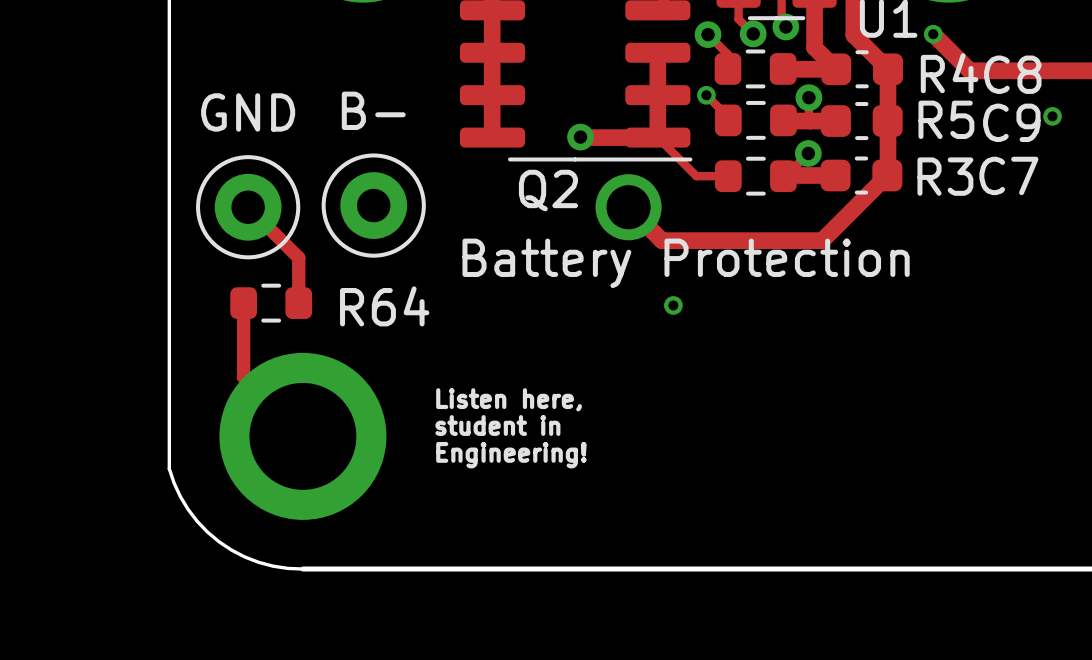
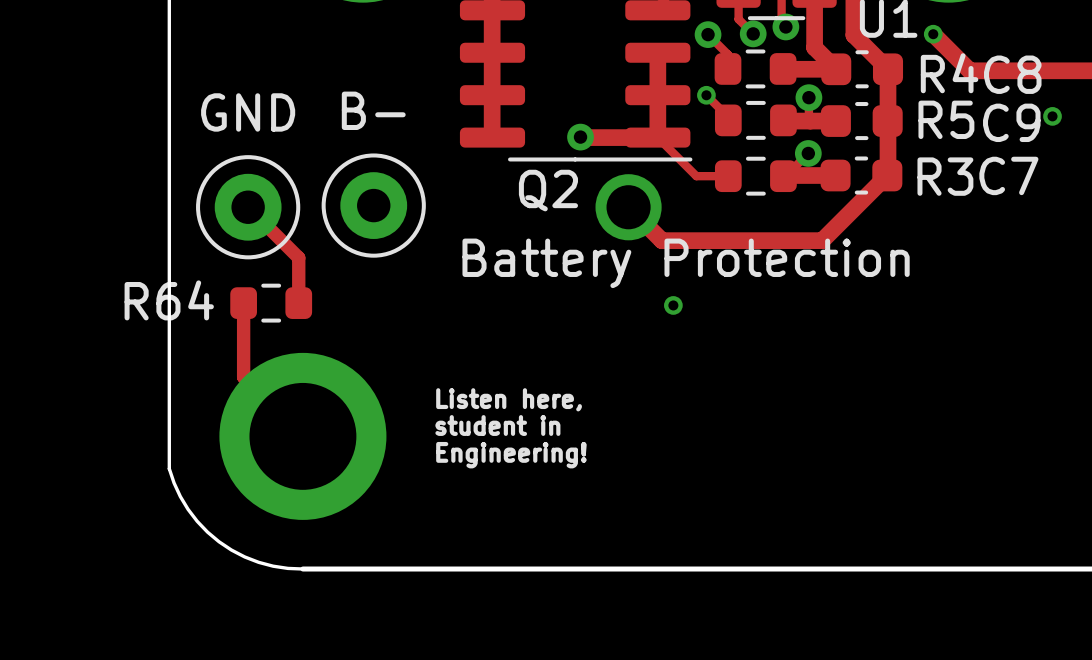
R64 name position: R64 (384, 306) -> R64 (169, 300)

